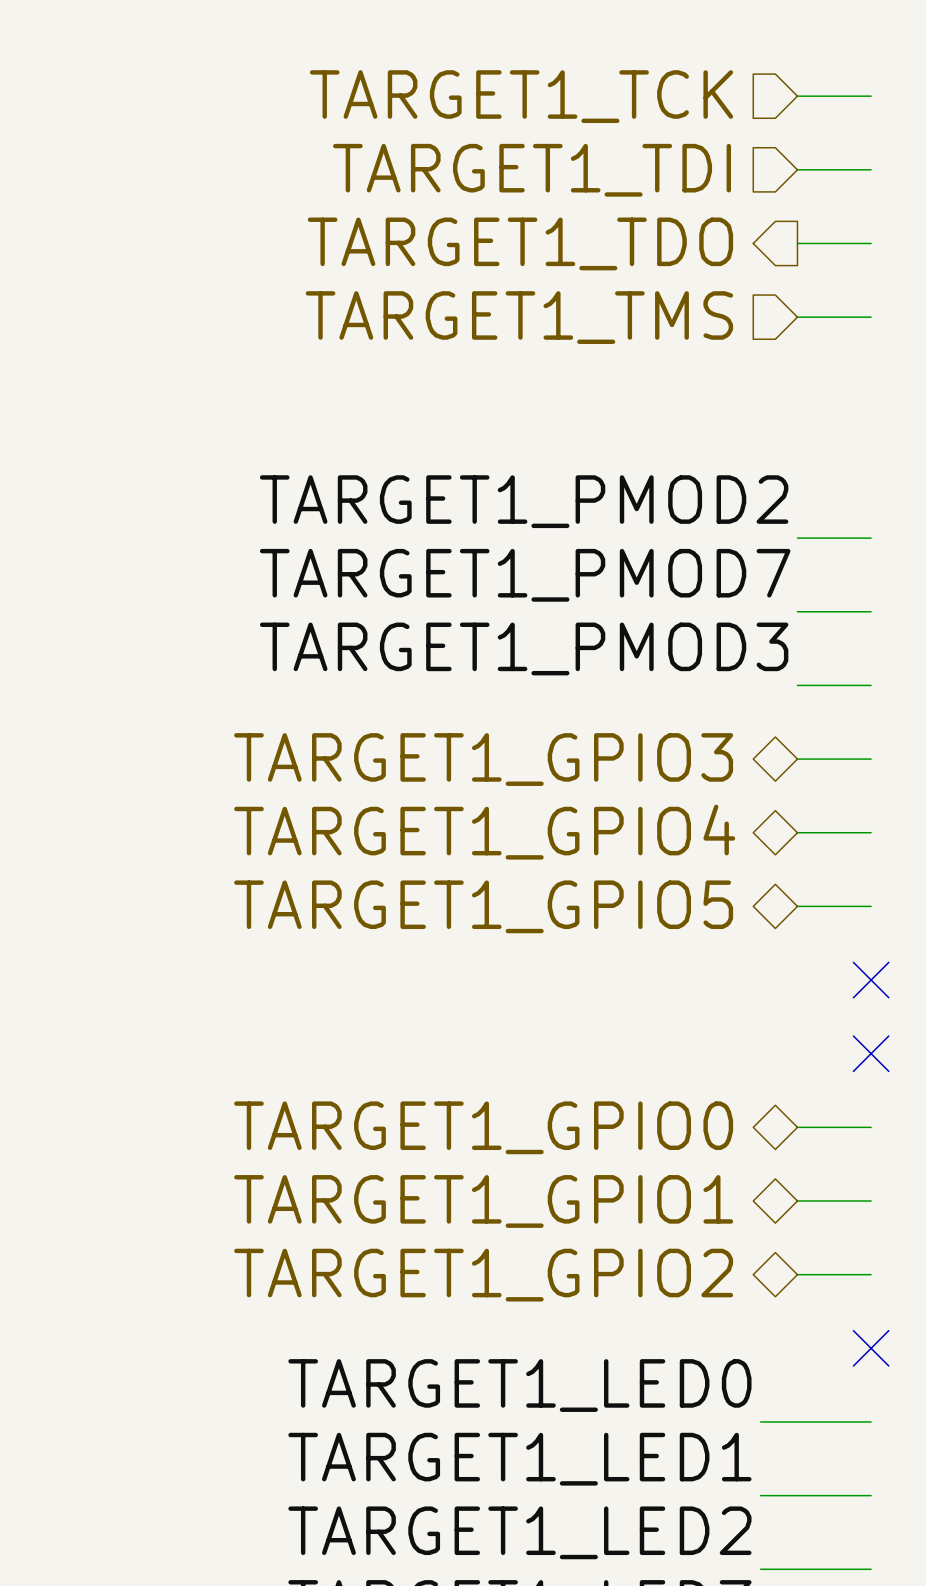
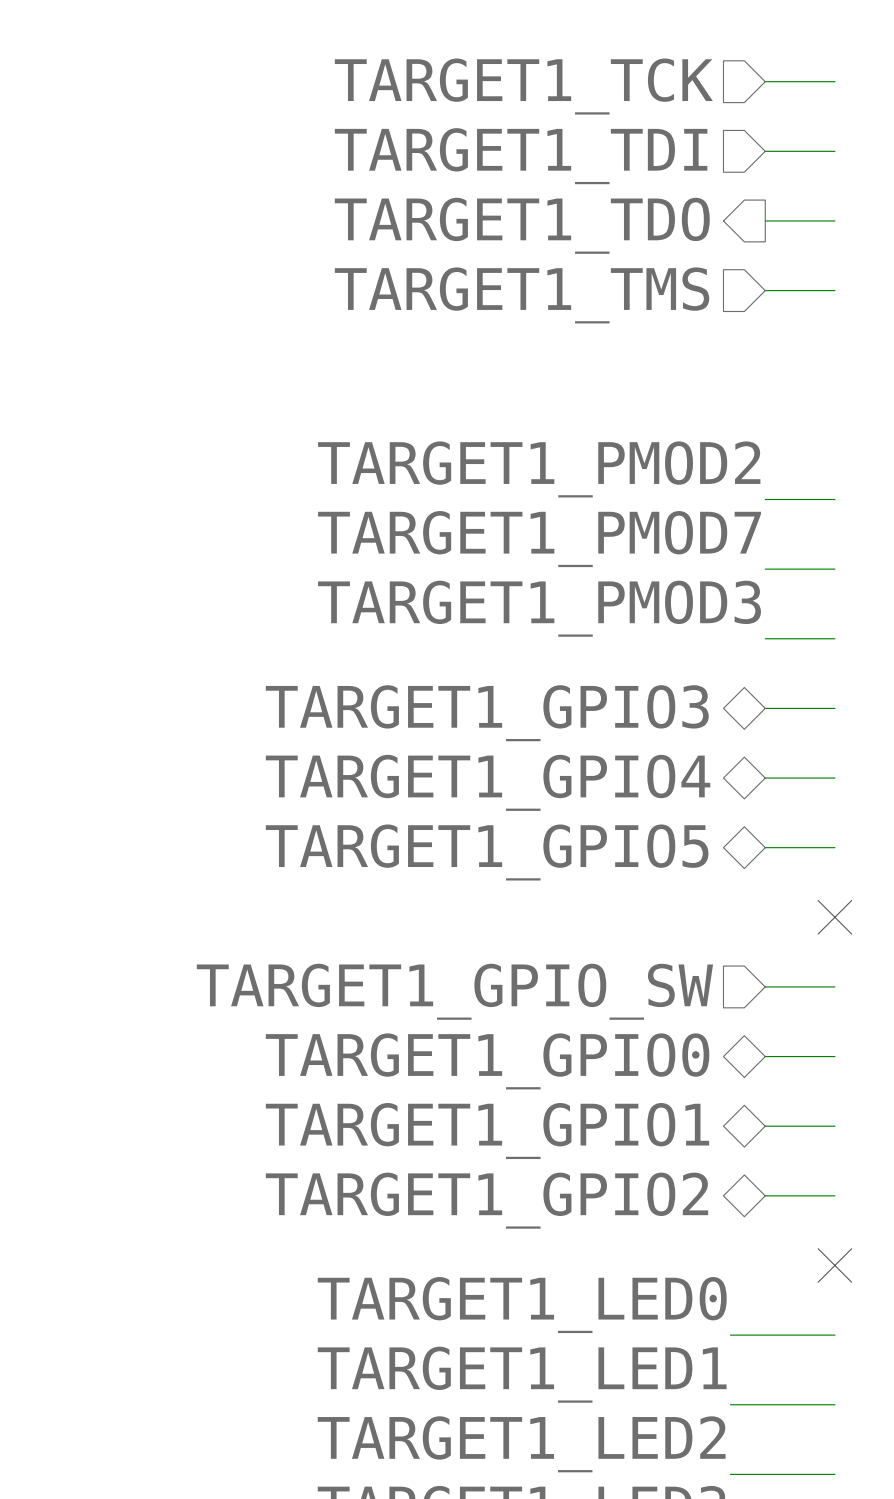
wire: none -> (765, 986) (834, 986)
no-connect mark: (871, 1053) -> none
hierarchical label: none -> TARGET1_GPIO_SW (454, 991)

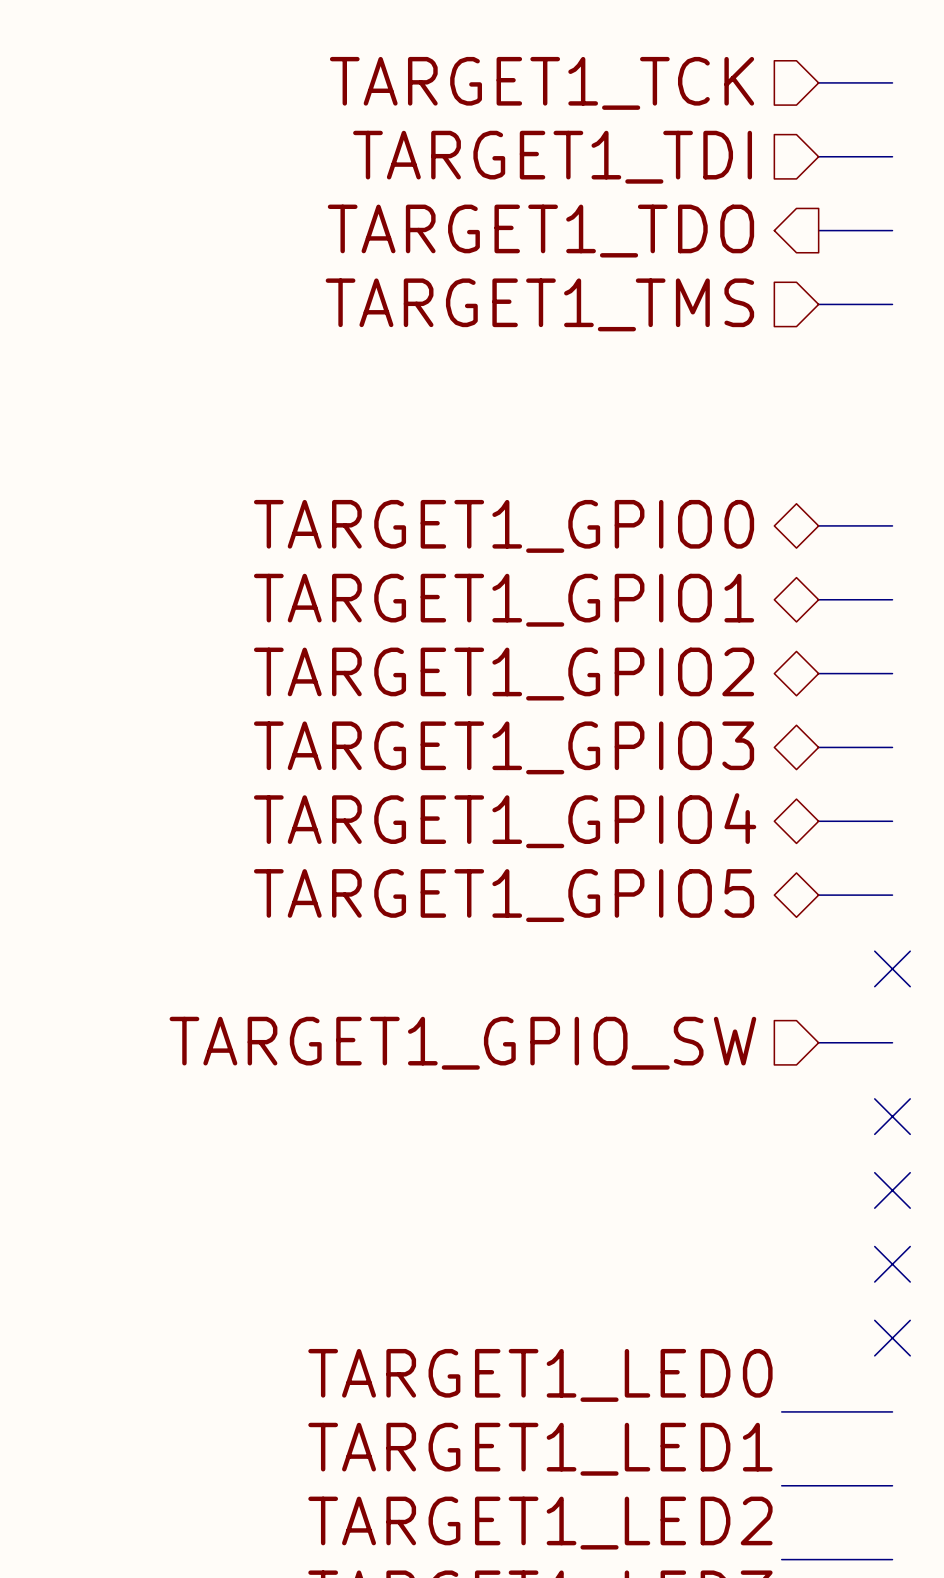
label: TARGET1_PMOD2 (539, 469) -> none
label: TARGET1_PMOD7 (539, 539) -> none
label: TARGET1_PMOD3 (539, 608) -> none
wire: (765, 1056) (834, 1056) -> none
no-connect mark: none -> (892, 1116)
hierarchical label position: TARGET1_GPIO0 (487, 1061) -> TARGET1_GPIO0 (504, 526)
wire: (765, 1126) (834, 1126) -> none
no-connect mark: none -> (892, 1190)
hierarchical label position: TARGET1_GPIO1 (487, 1131) -> TARGET1_GPIO1 (504, 600)
wire: (765, 1195) (834, 1195) -> none
no-connect mark: none -> (892, 1264)
hierarchical label position: TARGET1_GPIO2 (487, 1200) -> TARGET1_GPIO2 (504, 674)

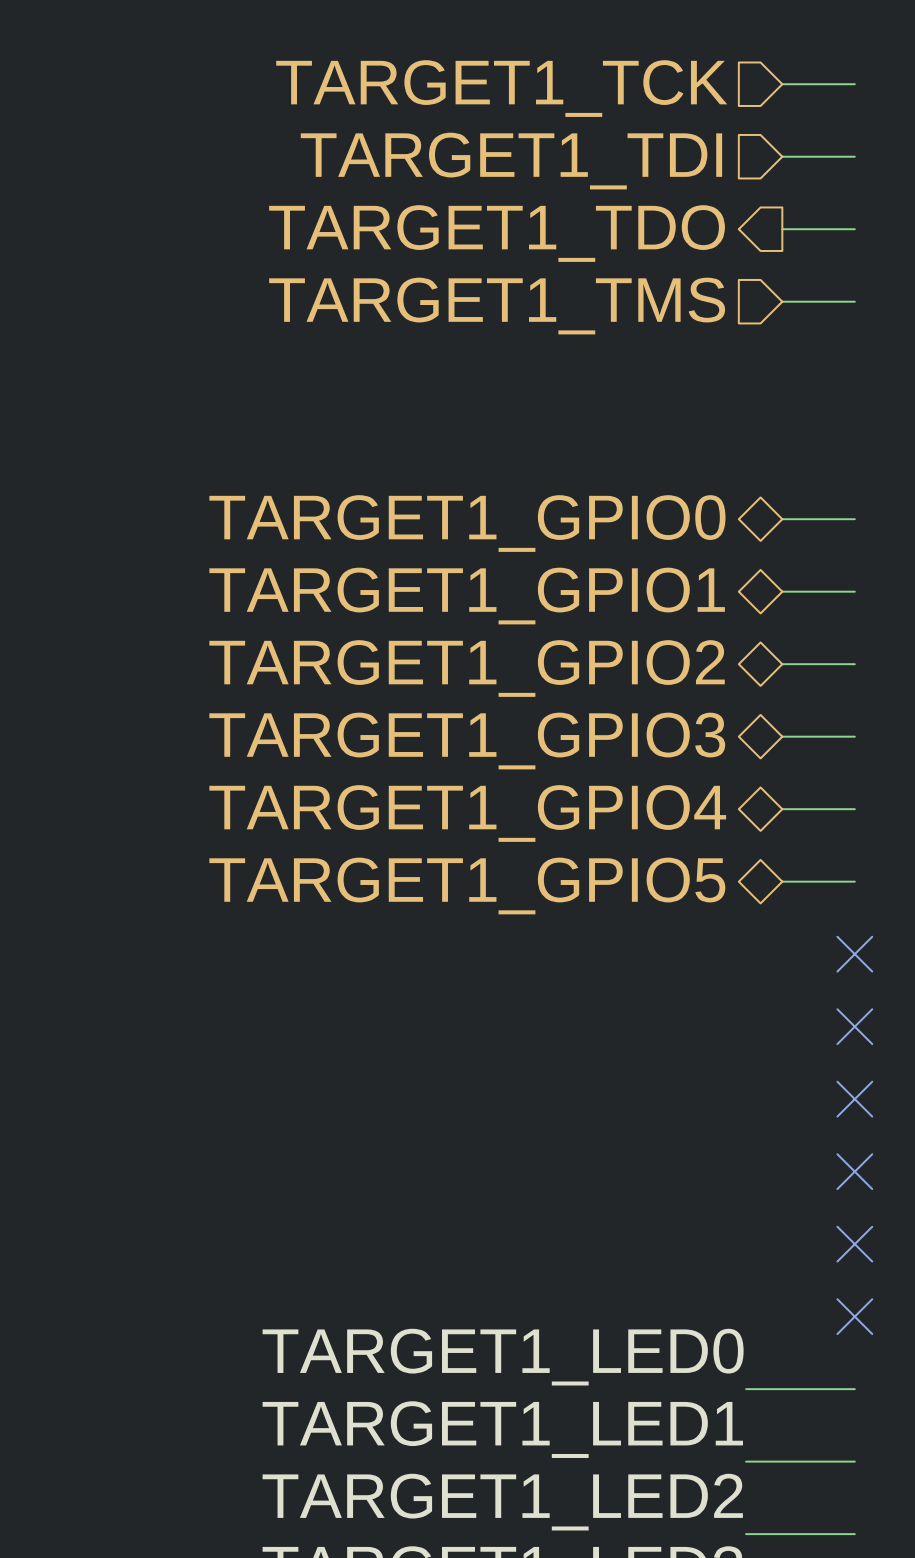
wire: (818, 1042) (892, 1042) -> none
no-connect mark: none -> (854, 1026)
hierarchical label: TARGET1_GPIO_SW (462, 1043) -> none

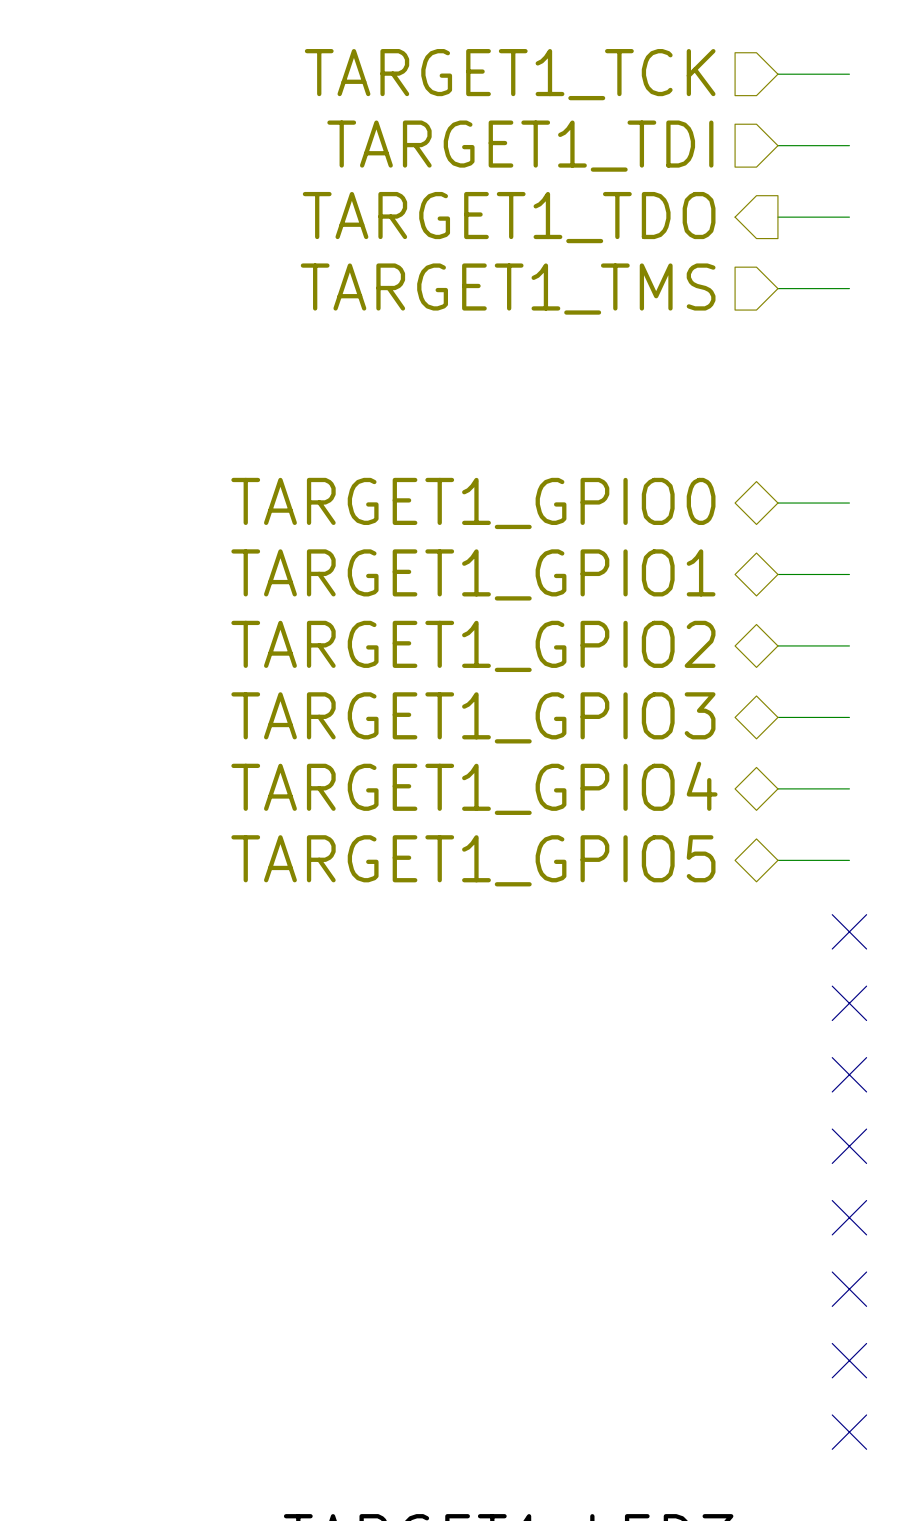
label: TARGET1_LED0 (503, 1357) -> none
wire: (746, 1389) (854, 1389) -> none
no-connect mark: none -> (849, 1360)
label: TARGET1_LED1 (502, 1429) -> none
wire: (746, 1461) (854, 1461) -> none
no-connect mark: none -> (849, 1432)
label: TARGET1_LED2 (502, 1502) -> none
wire: (746, 1534) (854, 1534) -> none

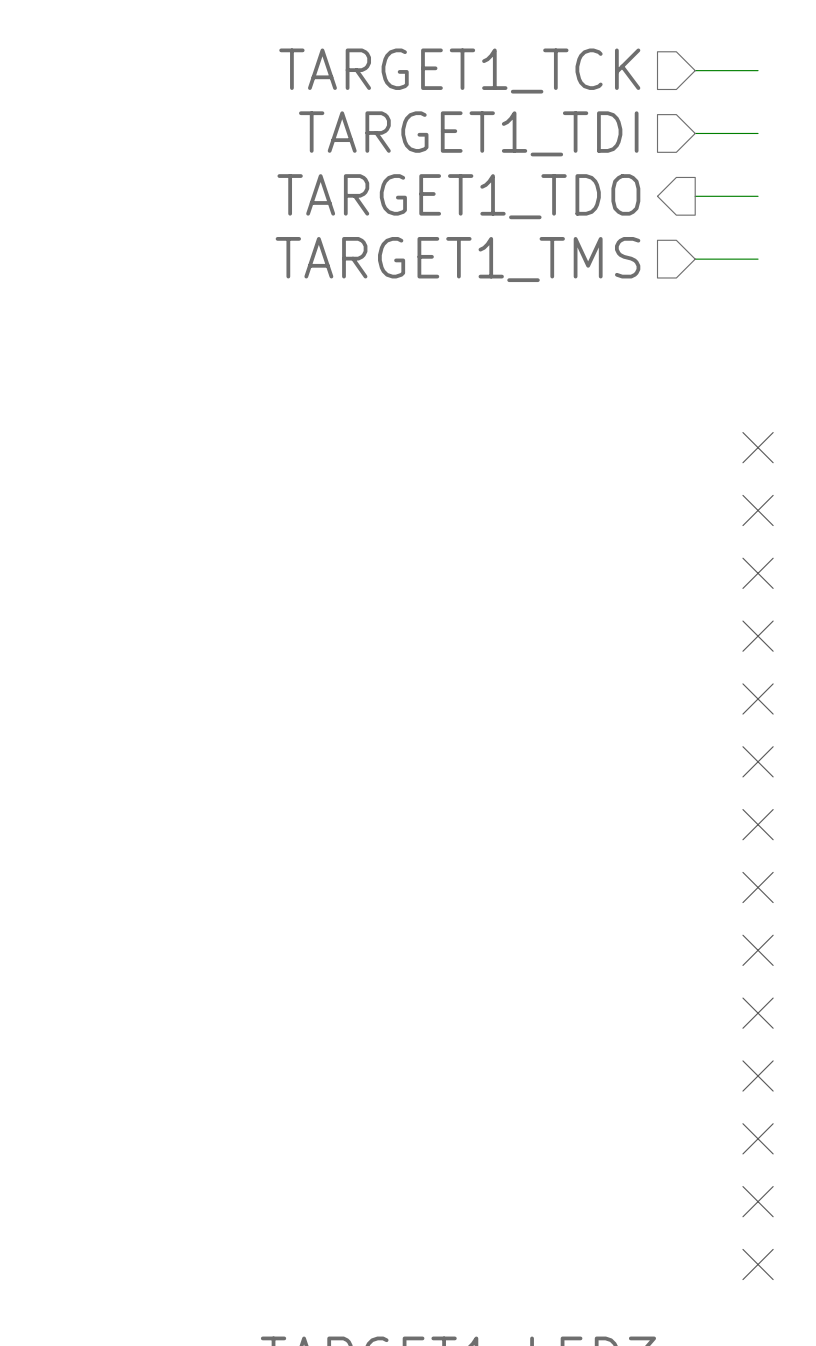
hierarchical label: TARGET1_GPIO0 (473, 503) -> none
wire: (777, 503) (849, 503) -> none
no-connect mark: none -> (758, 447)
hierarchical label: TARGET1_GPIO1 (473, 574) -> none
wire: (777, 574) (849, 574) -> none
no-connect mark: none -> (758, 510)
wire: (777, 645) (849, 645) -> none
no-connect mark: none -> (758, 573)
hierarchical label: TARGET1_GPIO2 (473, 646) -> none
hierarchical label: TARGET1_GPIO3 (473, 717) -> none
wire: (777, 717) (849, 717) -> none
no-connect mark: none -> (758, 636)
hierarchical label: TARGET1_GPIO4 (474, 788) -> none
wire: (777, 788) (849, 788) -> none
no-connect mark: none -> (758, 698)
hierarchical label: TARGET1_GPIO5 (473, 860) -> none
wire: (777, 860) (849, 860) -> none
no-connect mark: none -> (758, 761)

